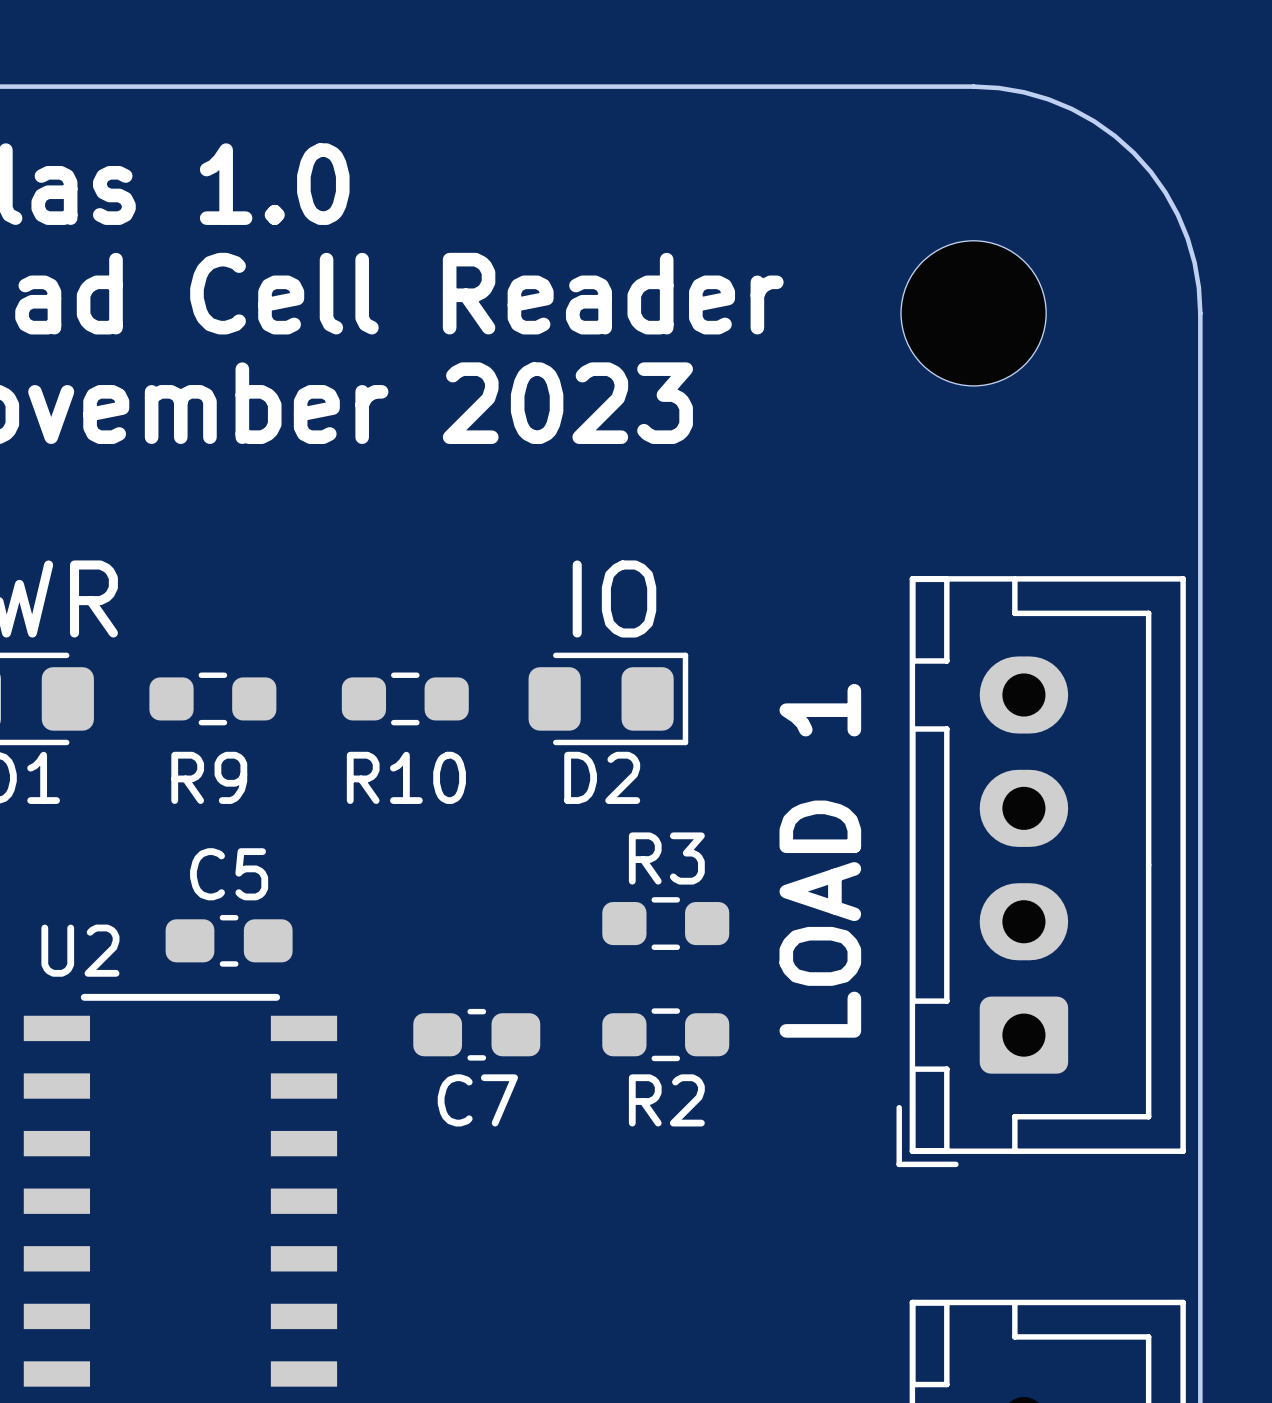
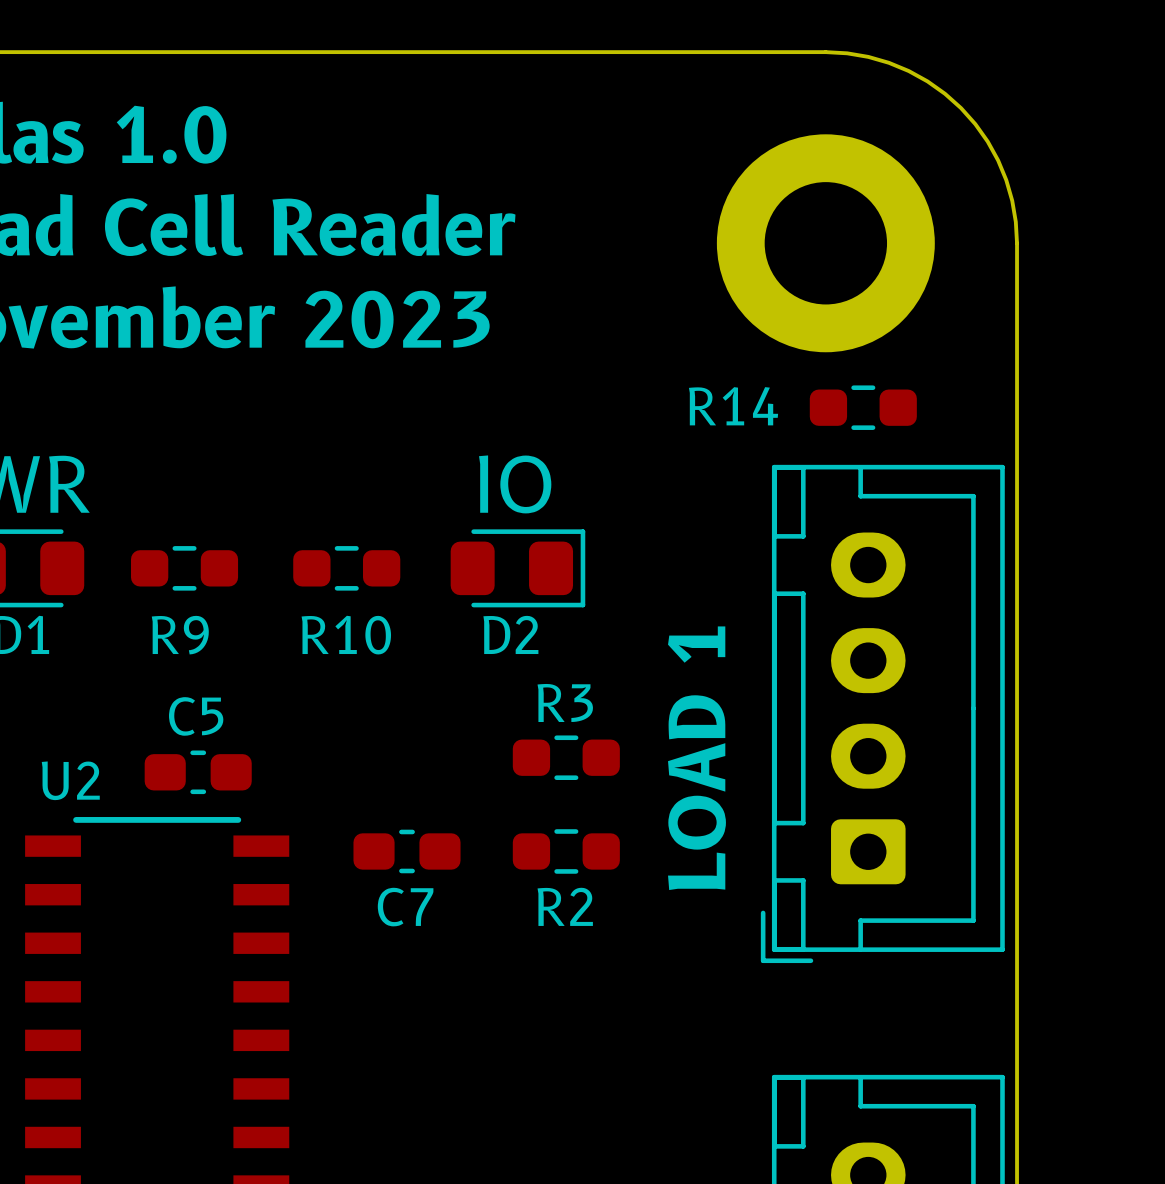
part footprint: [901, 240, 1047, 386] -> [716, 134, 935, 353]
R14: none -> (863, 407)
text position: LOAD 1 (820, 860) -> LOAD 1 (696, 758)

